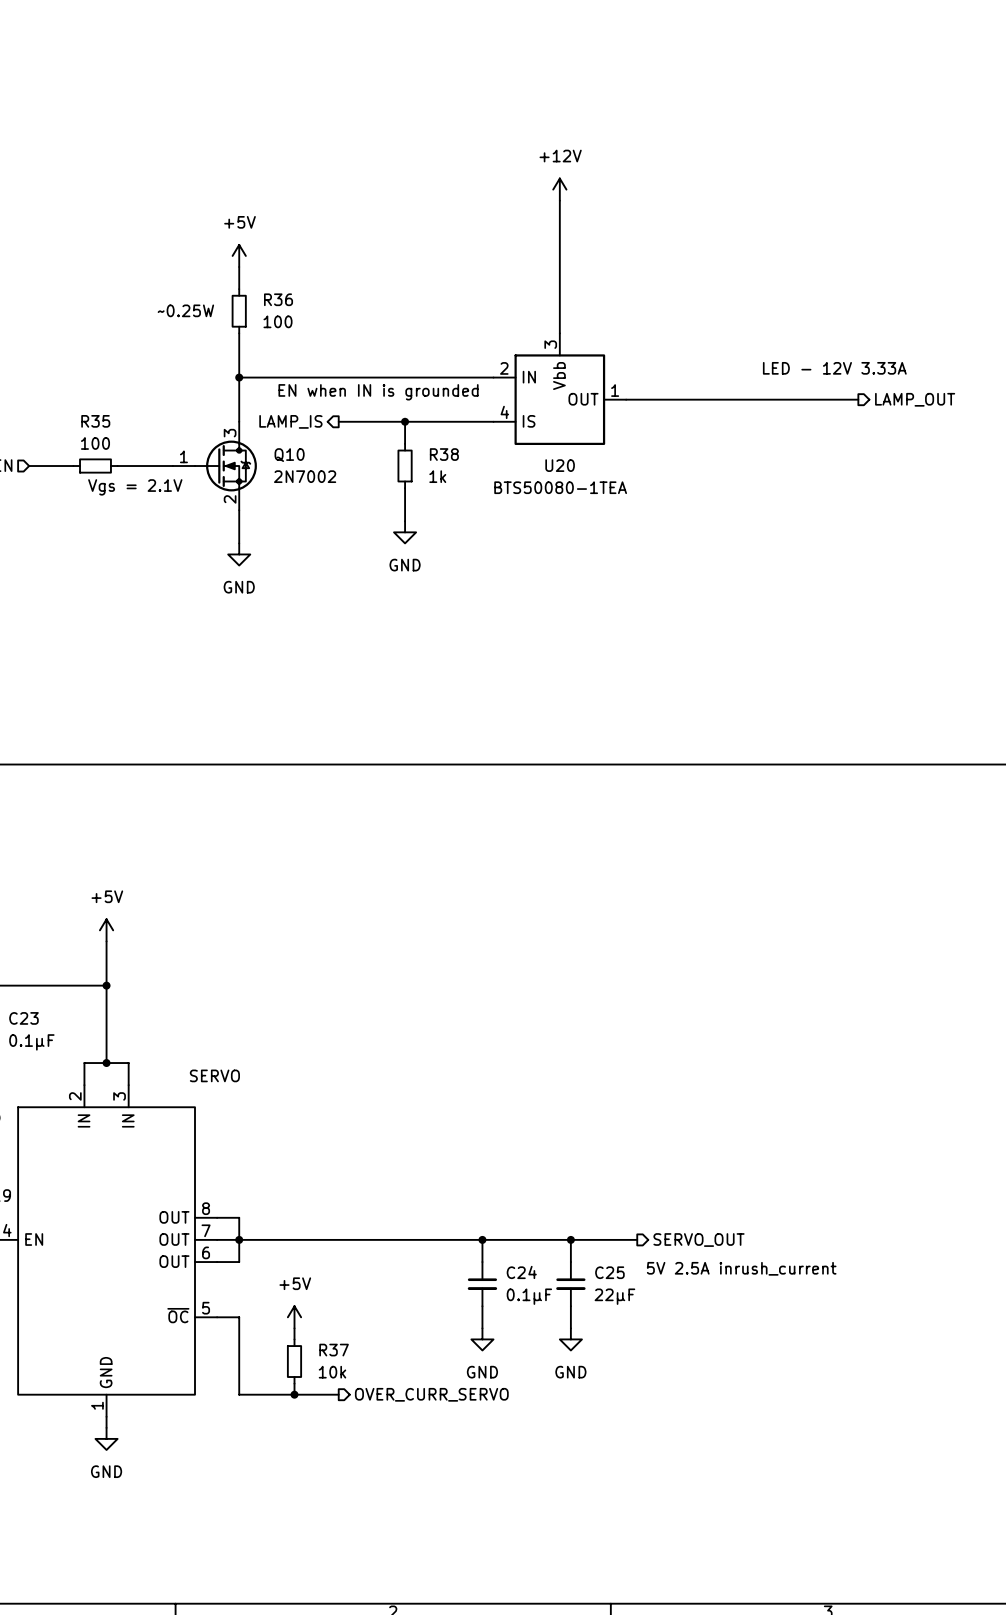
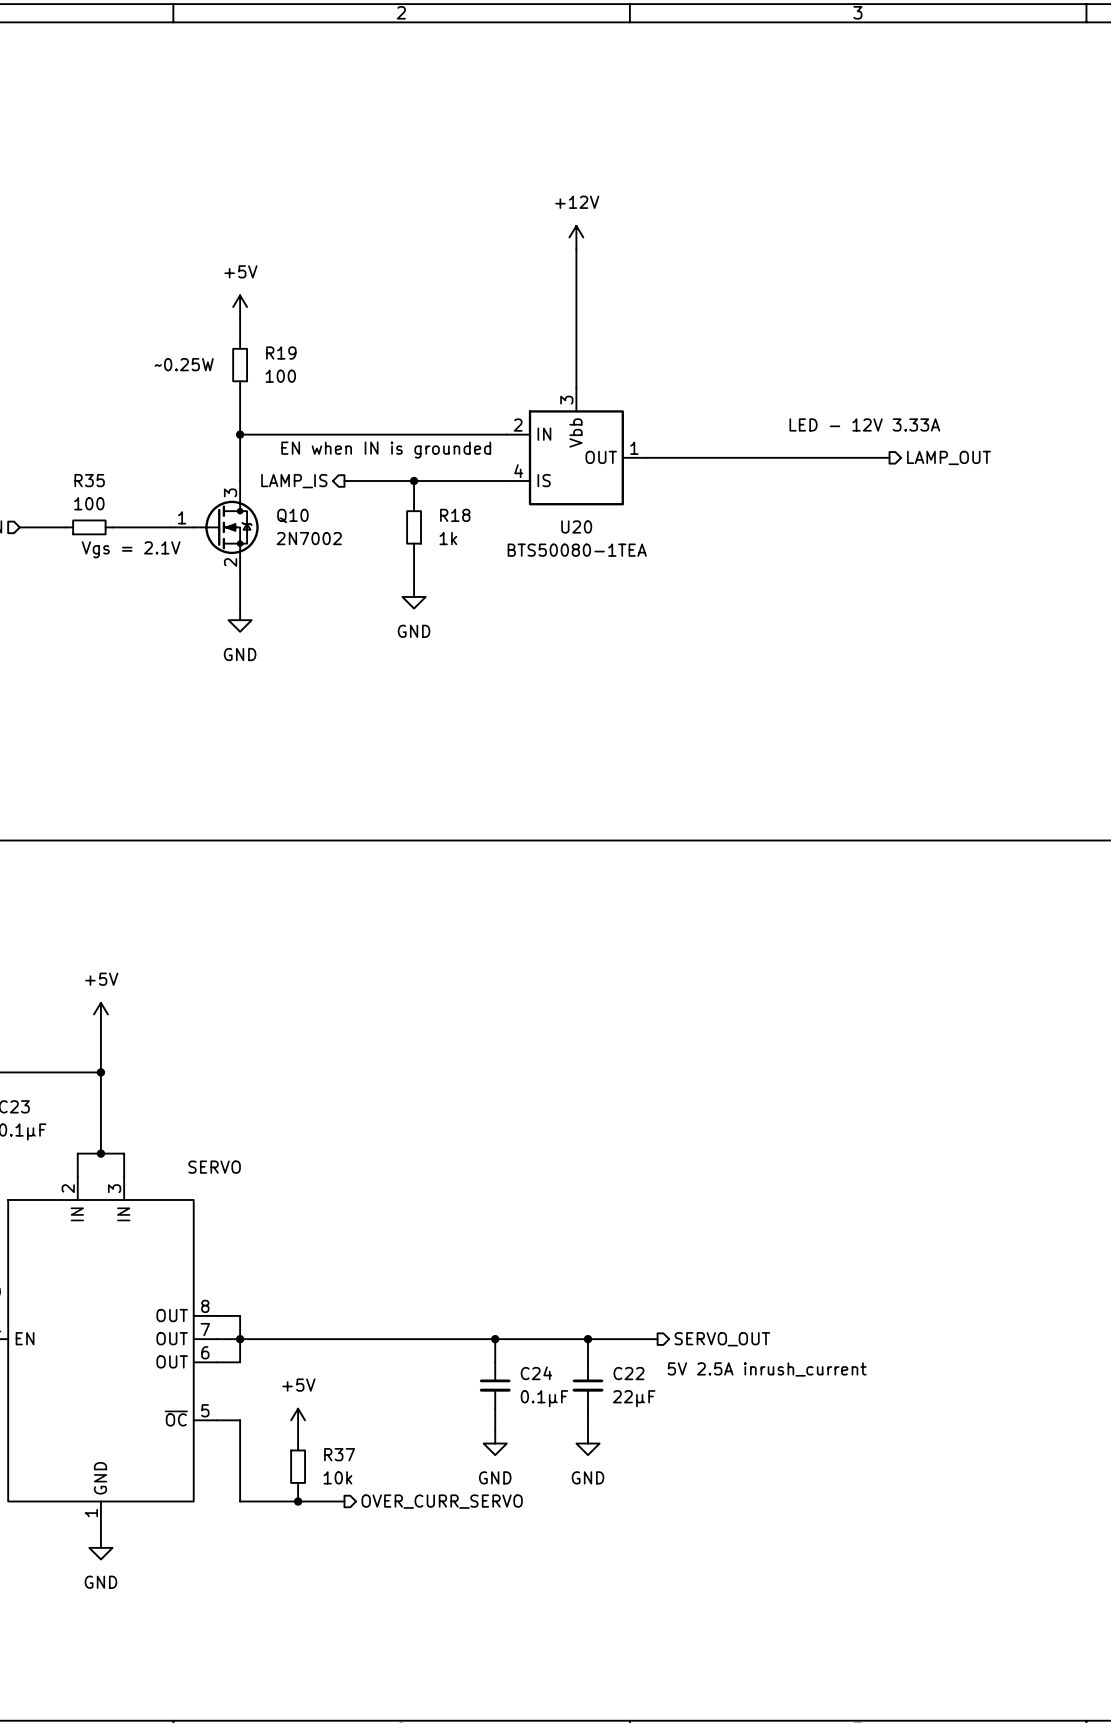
R36 name: R36 (278, 299) -> R19 (281, 353)
R38 name: R38 (444, 454) -> R18 (455, 515)
C25 name: C25 (609, 1272) -> C22 (628, 1373)

